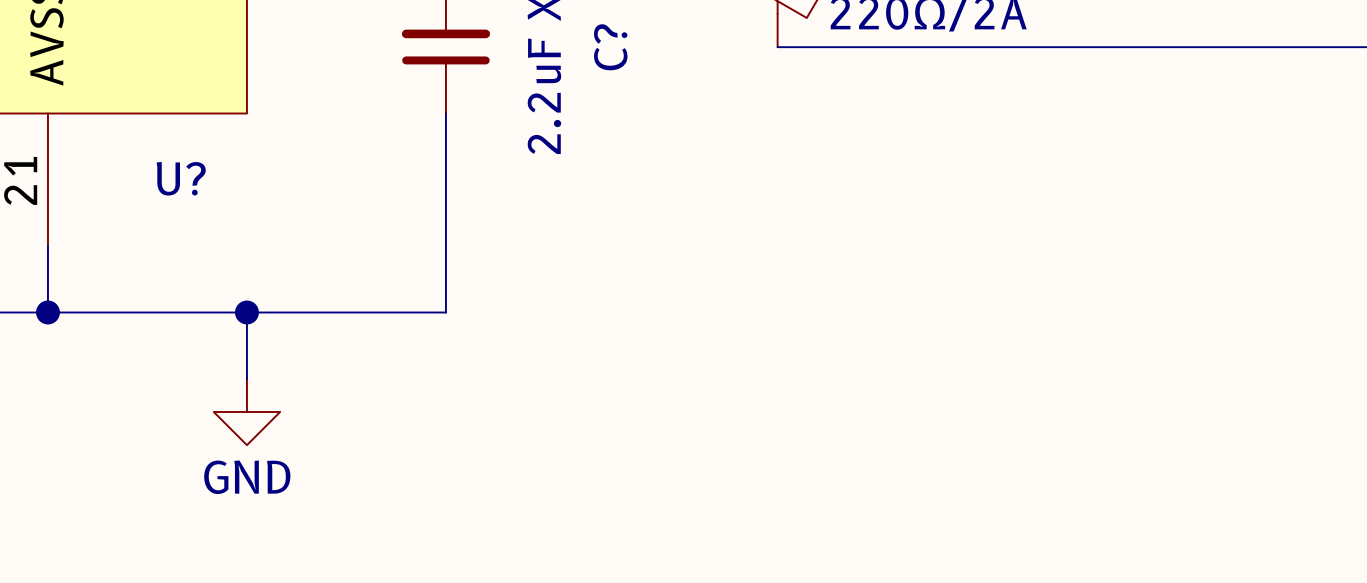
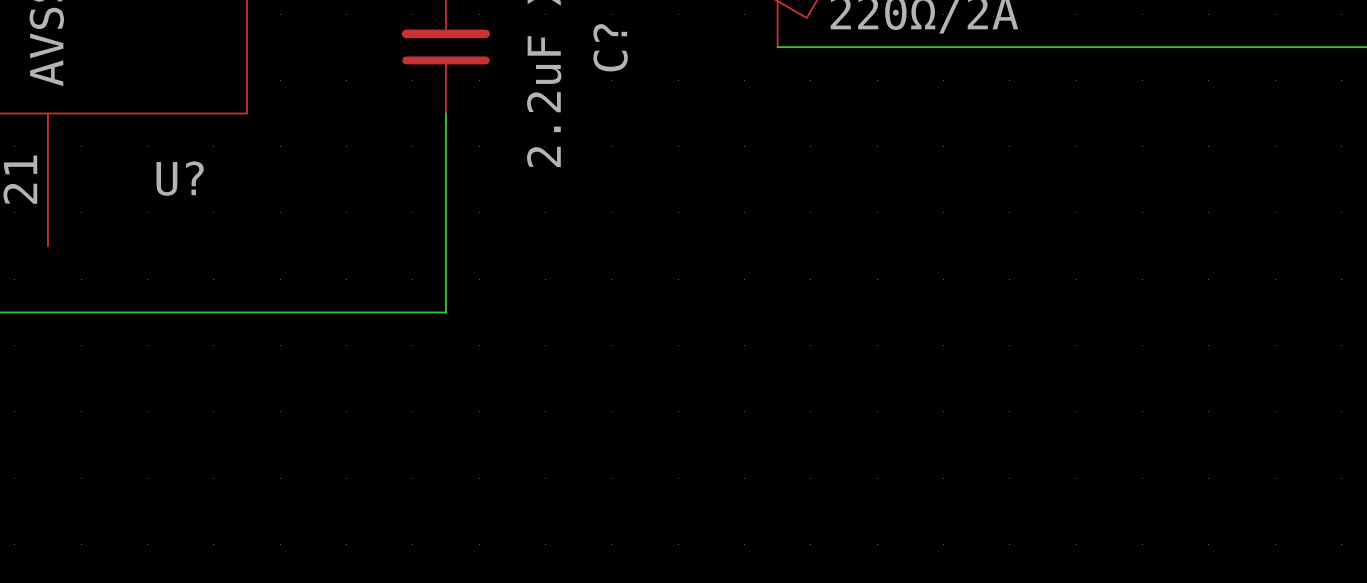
wire: (47, 246) (47, 312) -> none
junction: (47, 312) -> none
wire: (246, 312) (246, 378) -> none
junction: (246, 312) -> none
power symbol: GND (246, 411) -> none

